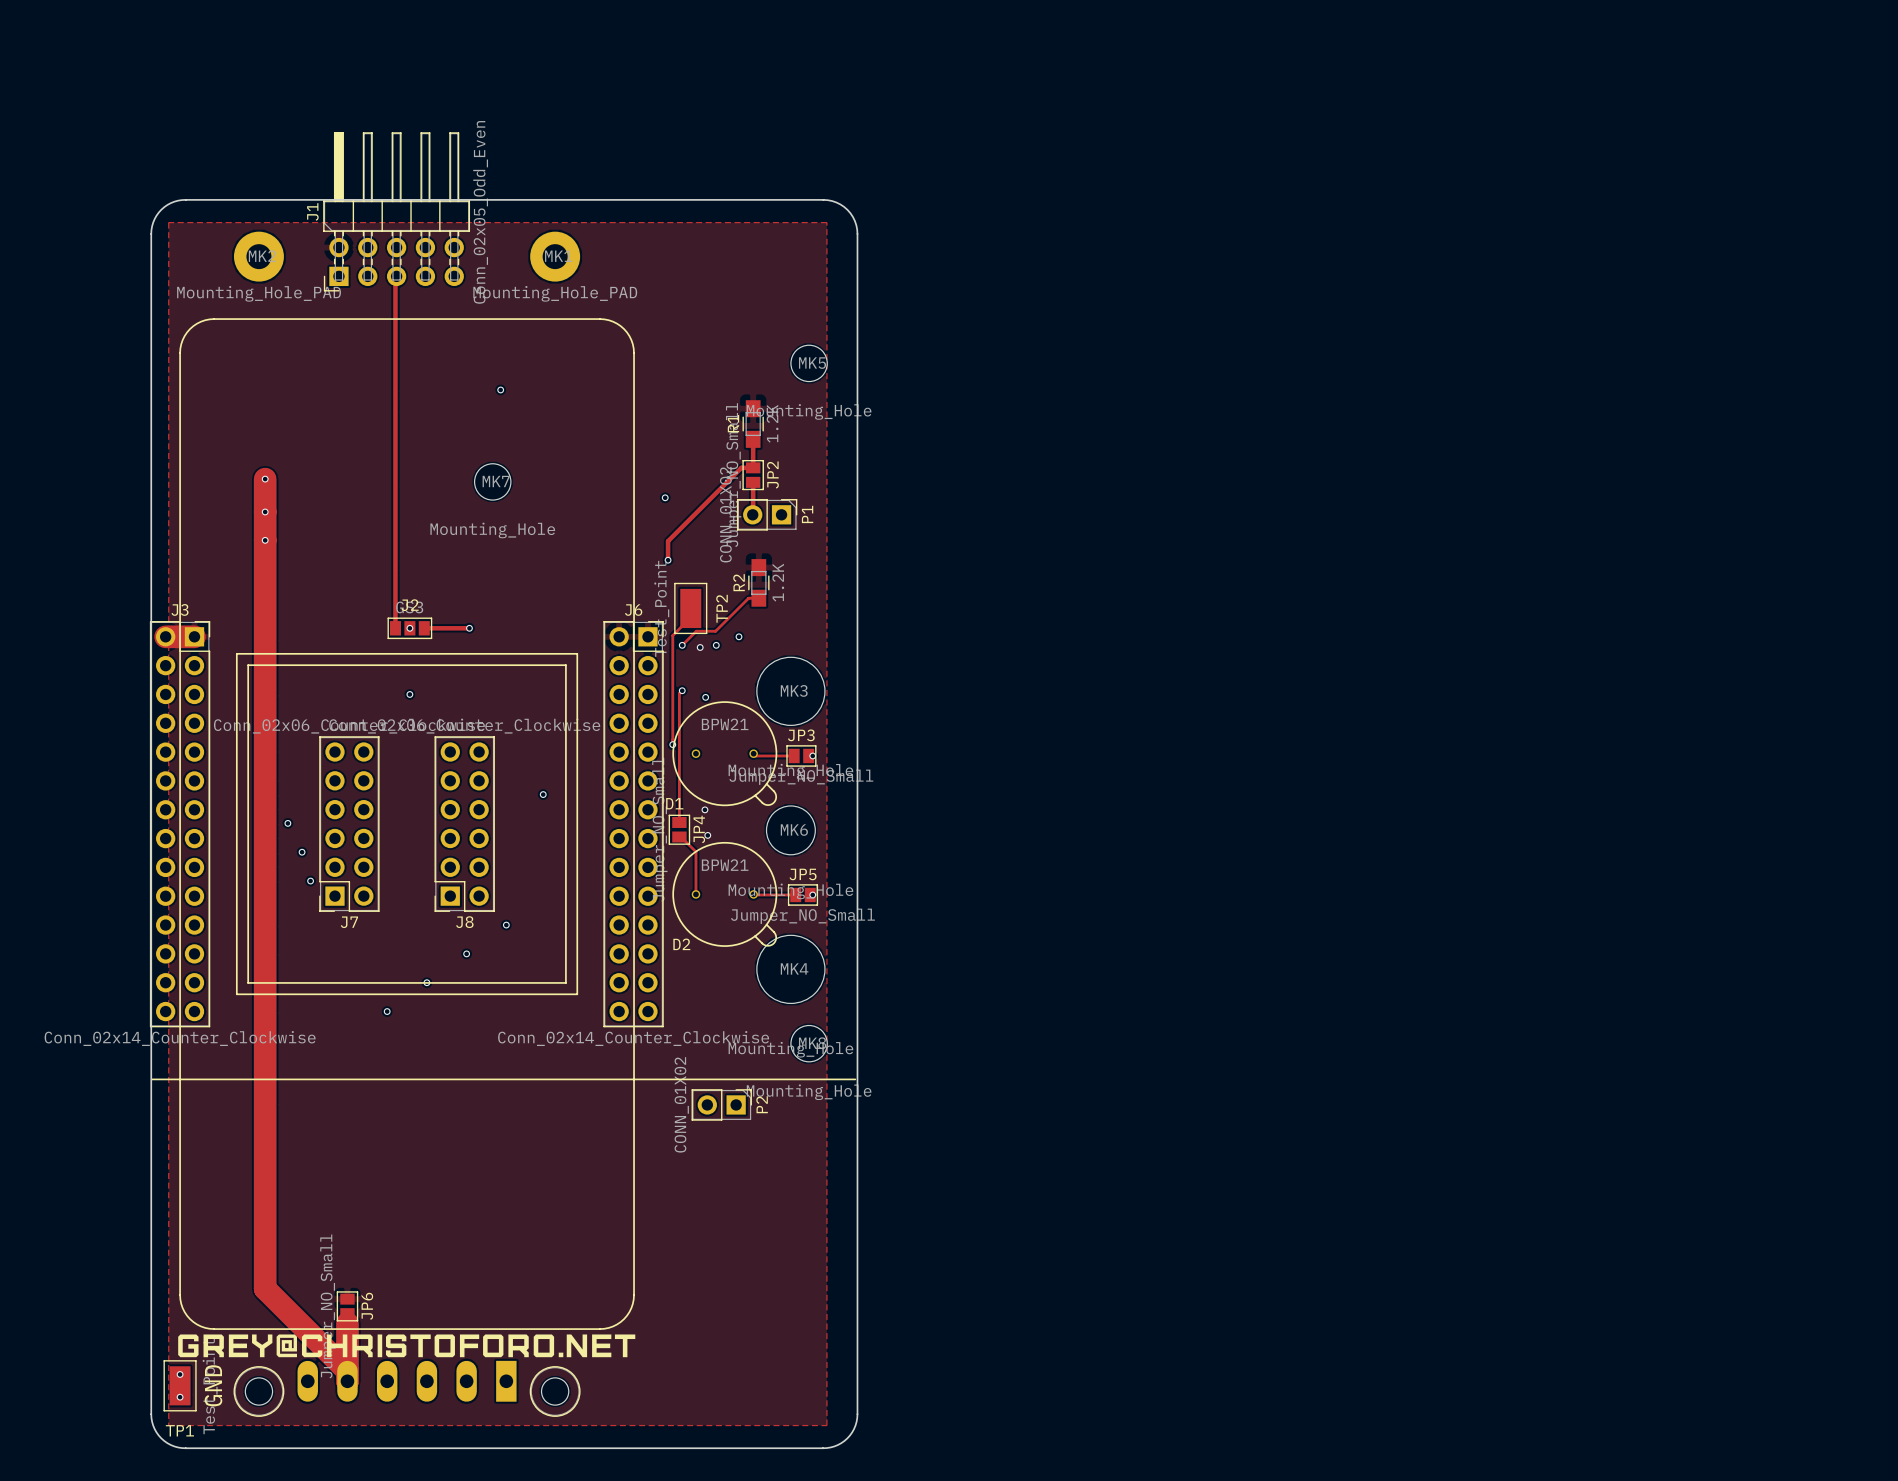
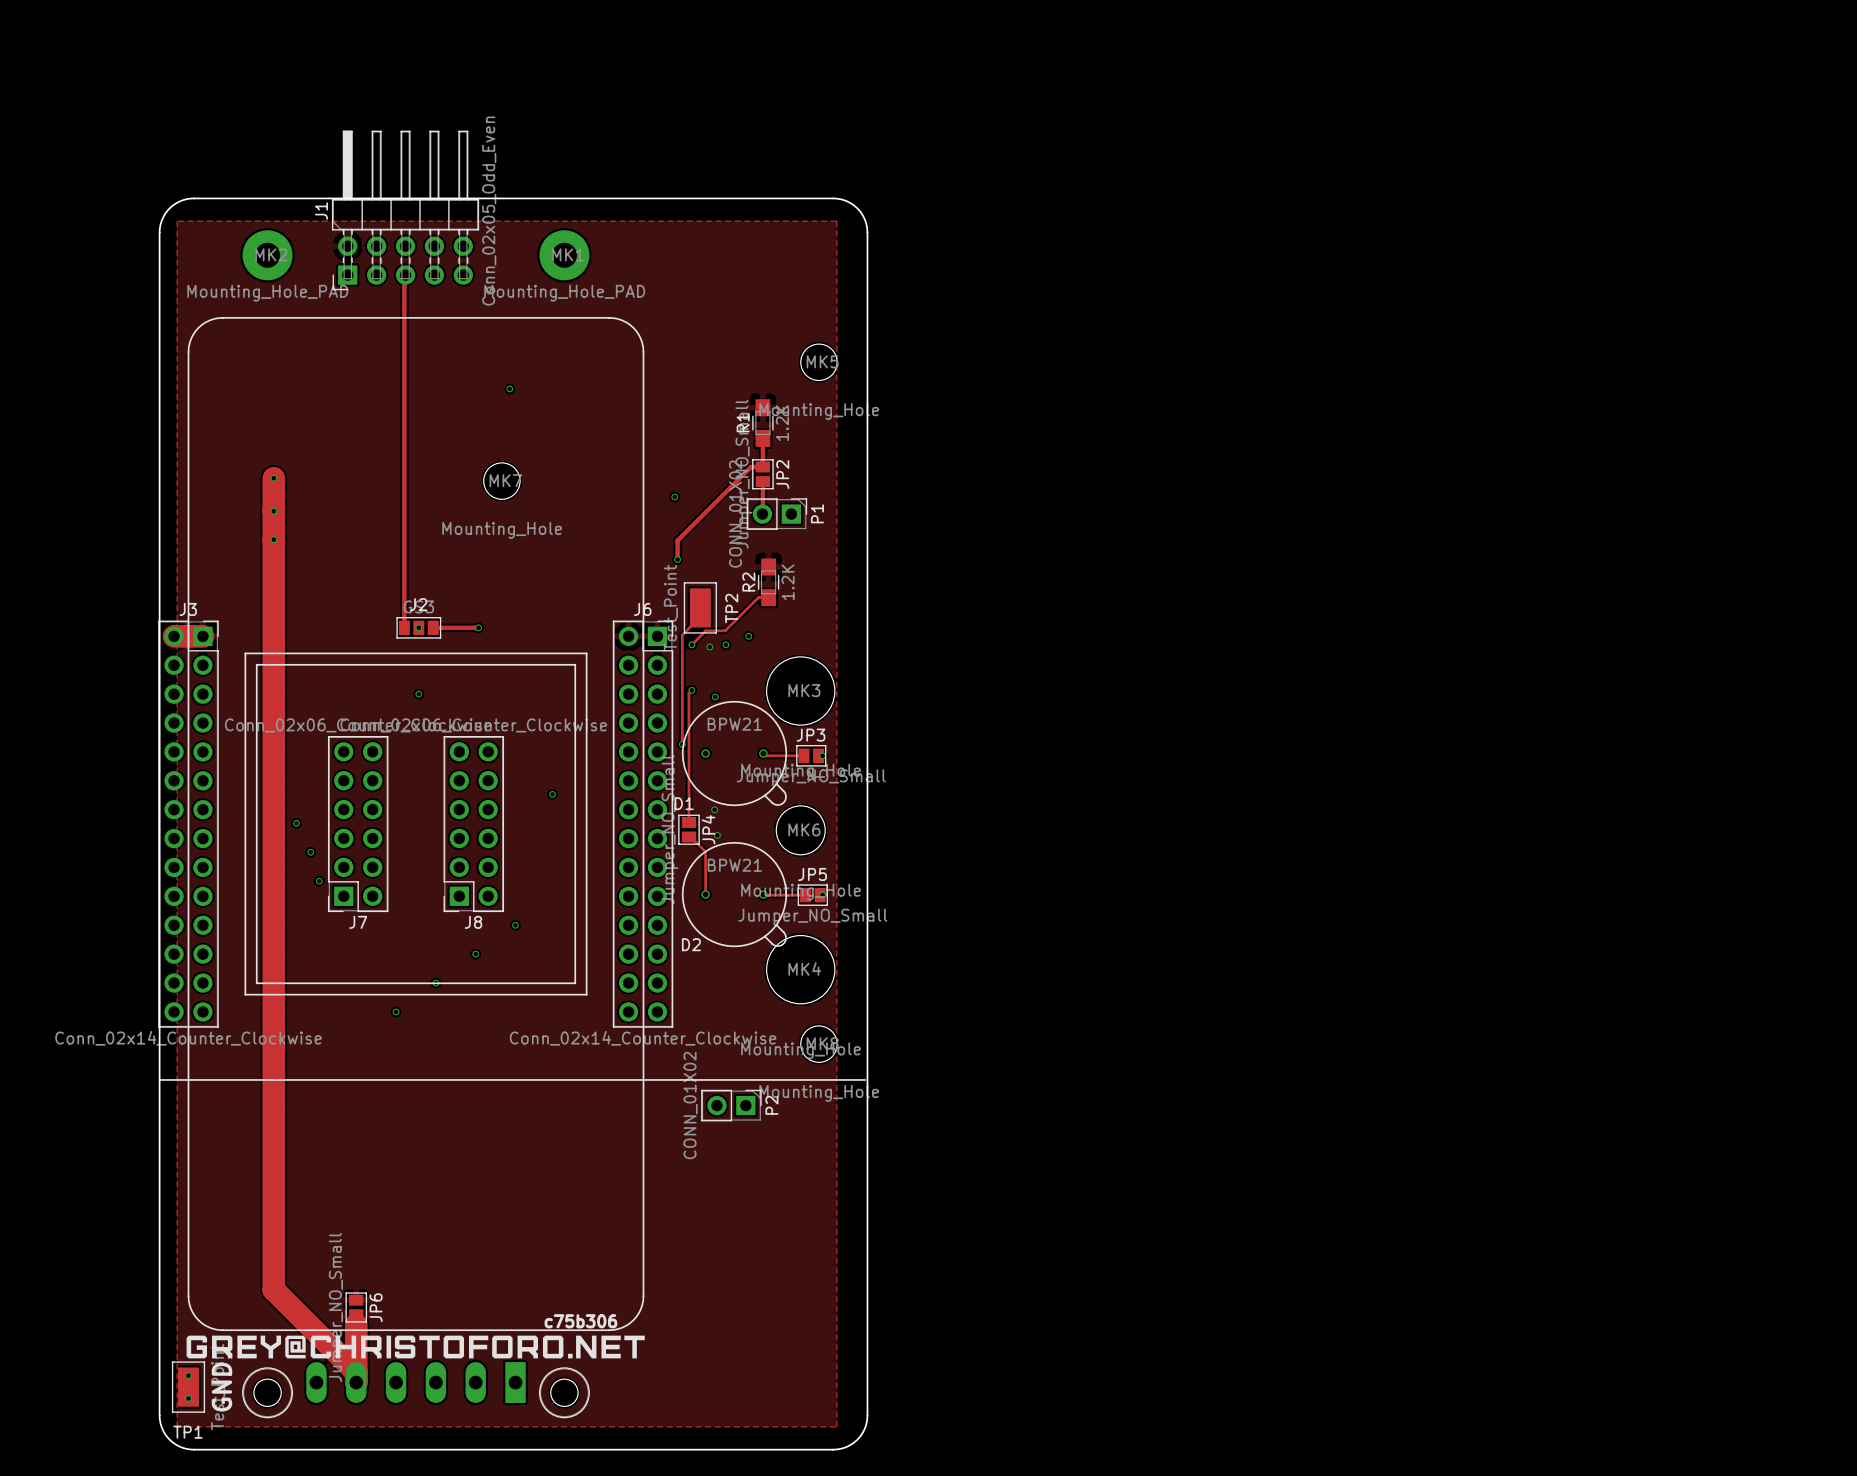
text: none -> c75b306 (580, 1321)

